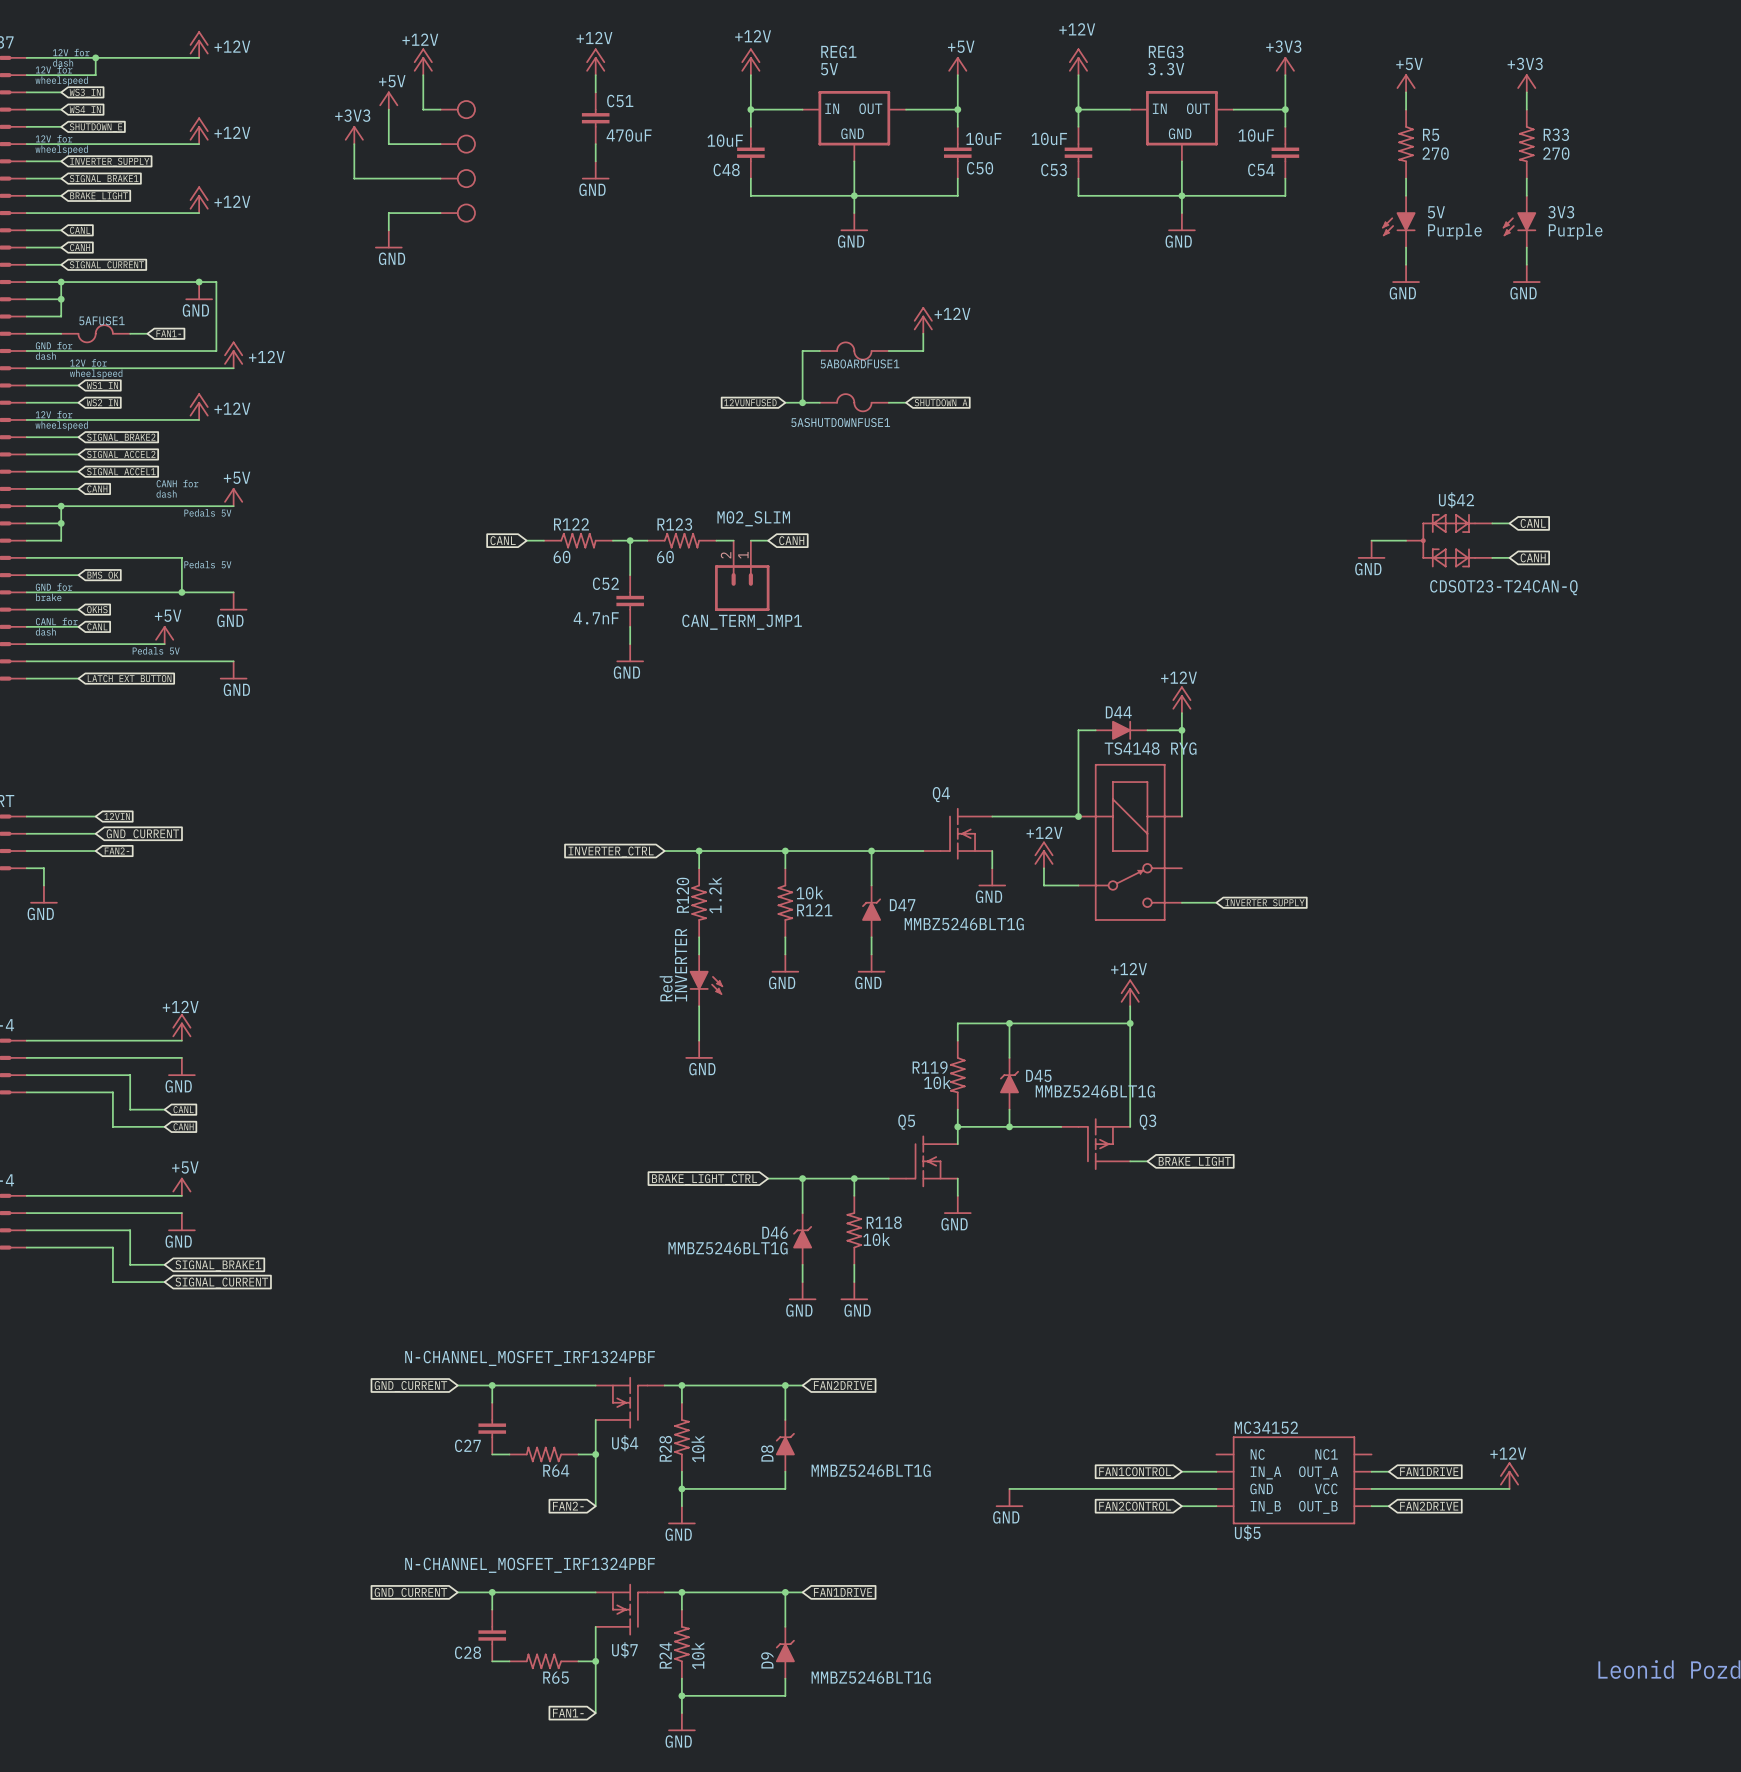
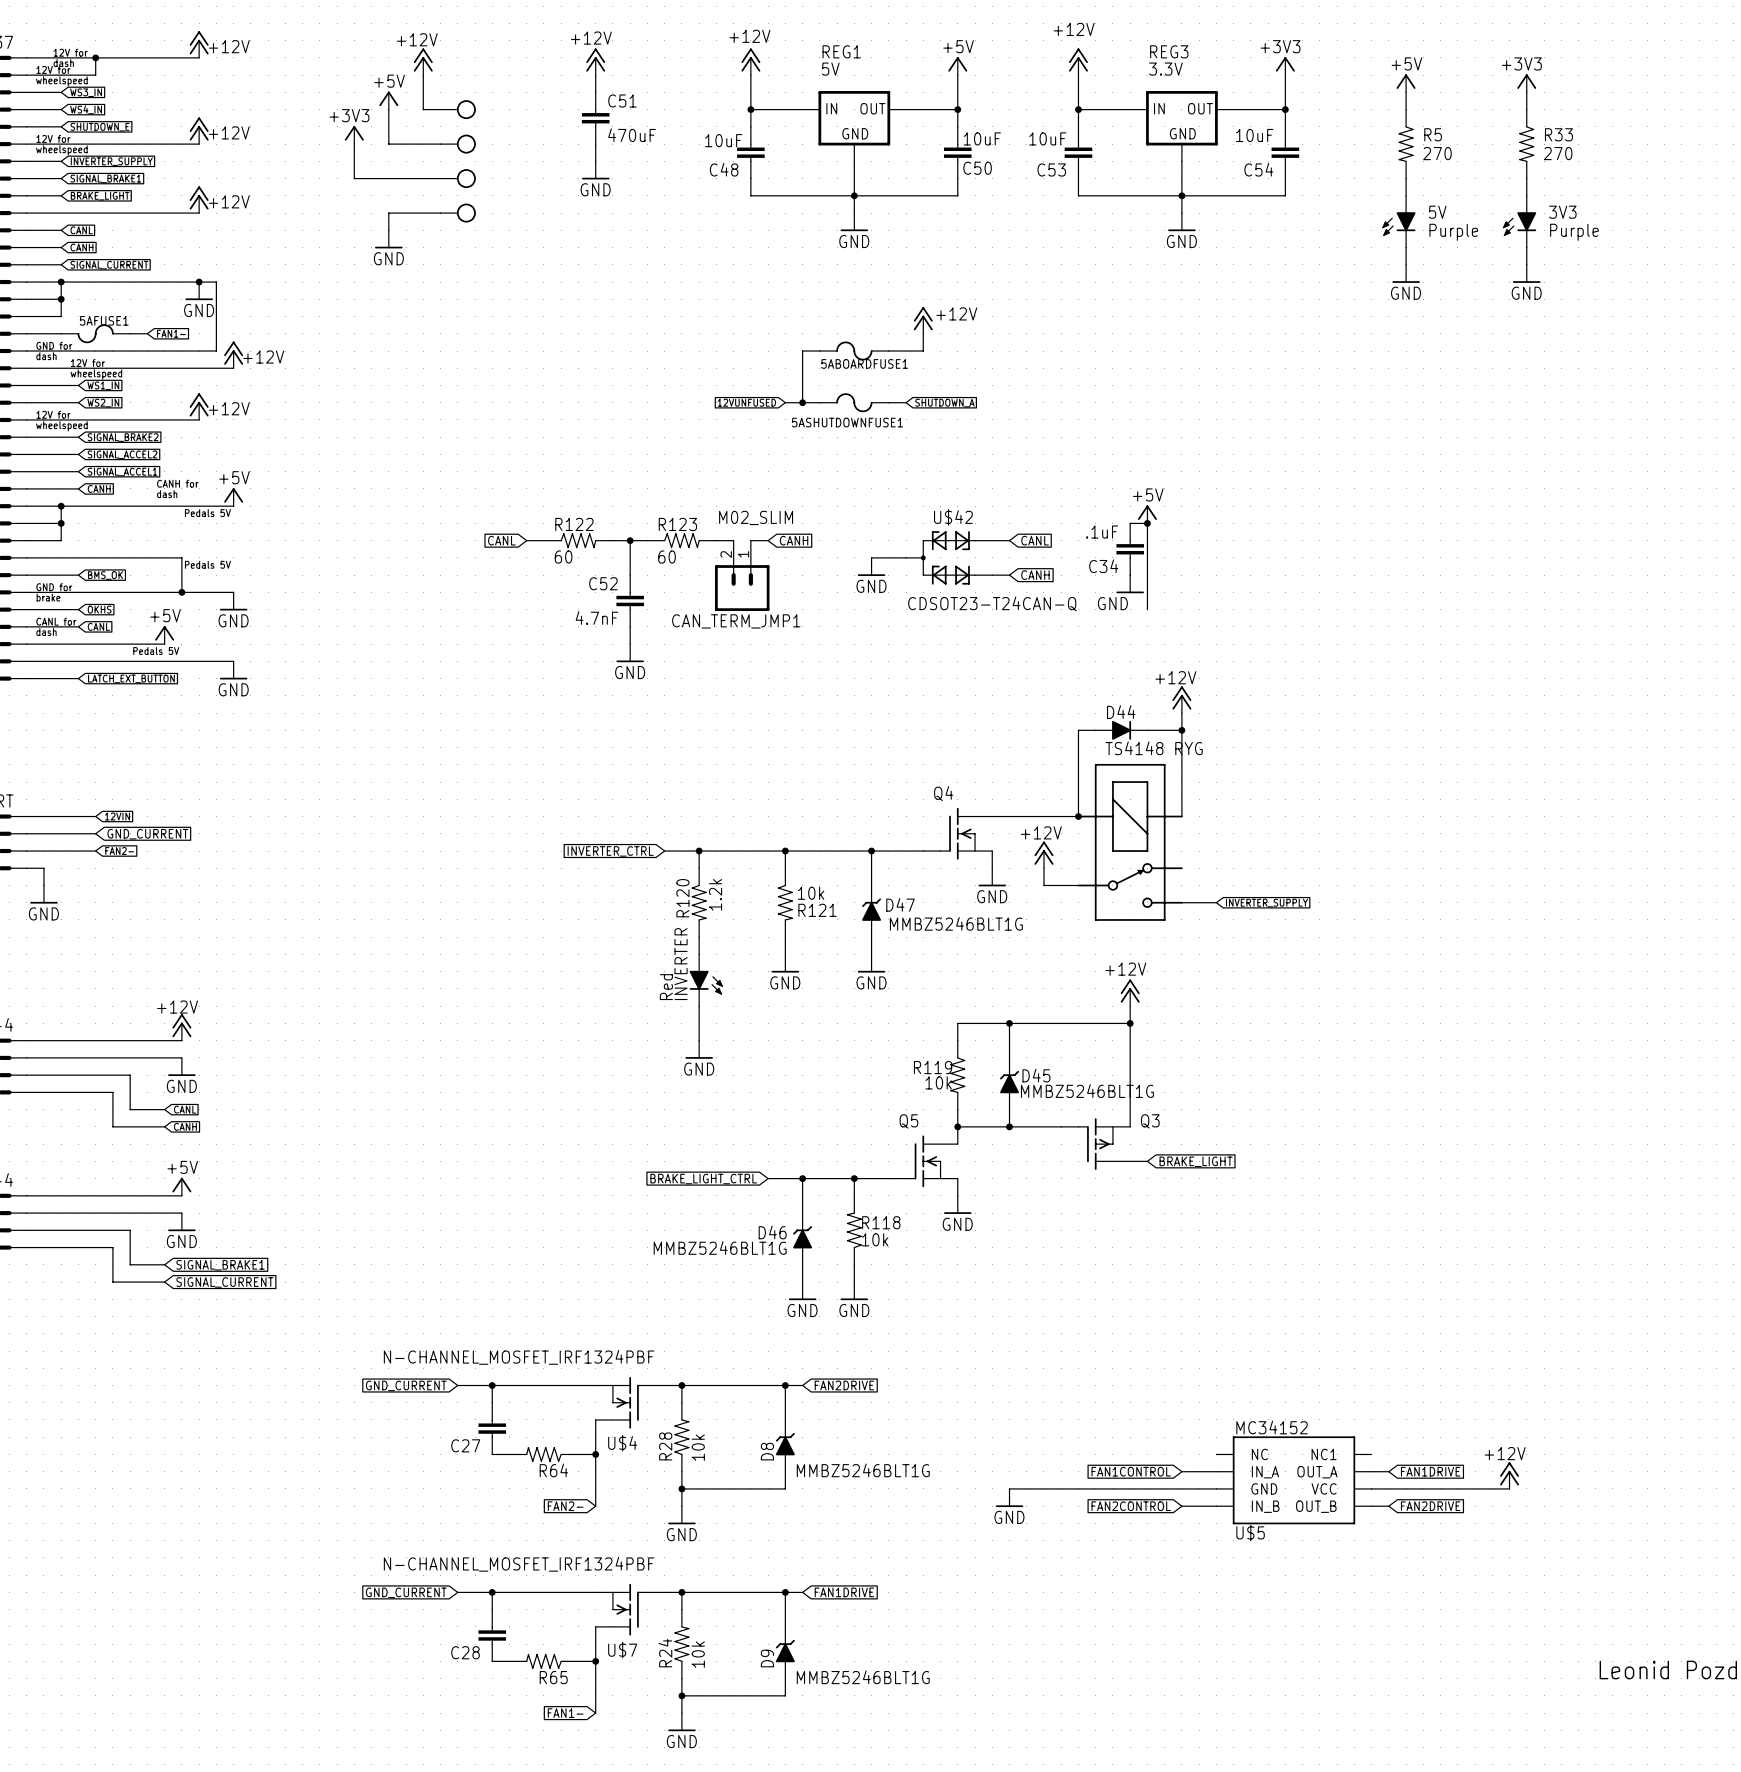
power symbol: none -> +5V (1147, 514)
wire: none -> (1130, 523) (1147, 523) (1147, 609)
junction: none -> (1147, 523)
wire: (1492, 523) (1509, 523) -> none
global label: CANL (1533, 523) -> none
wire: none -> (992, 540) (1009, 540)
global label: none -> CANL (1035, 540)
wire: (1371, 540) (1406, 540) -> none
U$42 position: (1449, 540) -> (949, 557)
C34: none -> .1uF (1130, 549)
power symbol: GND (1371, 549) -> none
wire: none -> (871, 557) (906, 557)
wire: (1492, 557) (1509, 557) -> none
global label: CANH (1533, 557) -> none
power symbol: none -> GND (871, 566)
wire: none -> (992, 575) (1009, 575)
global label: none -> CANH (1035, 575)
power symbol: none -> GND (1130, 584)

